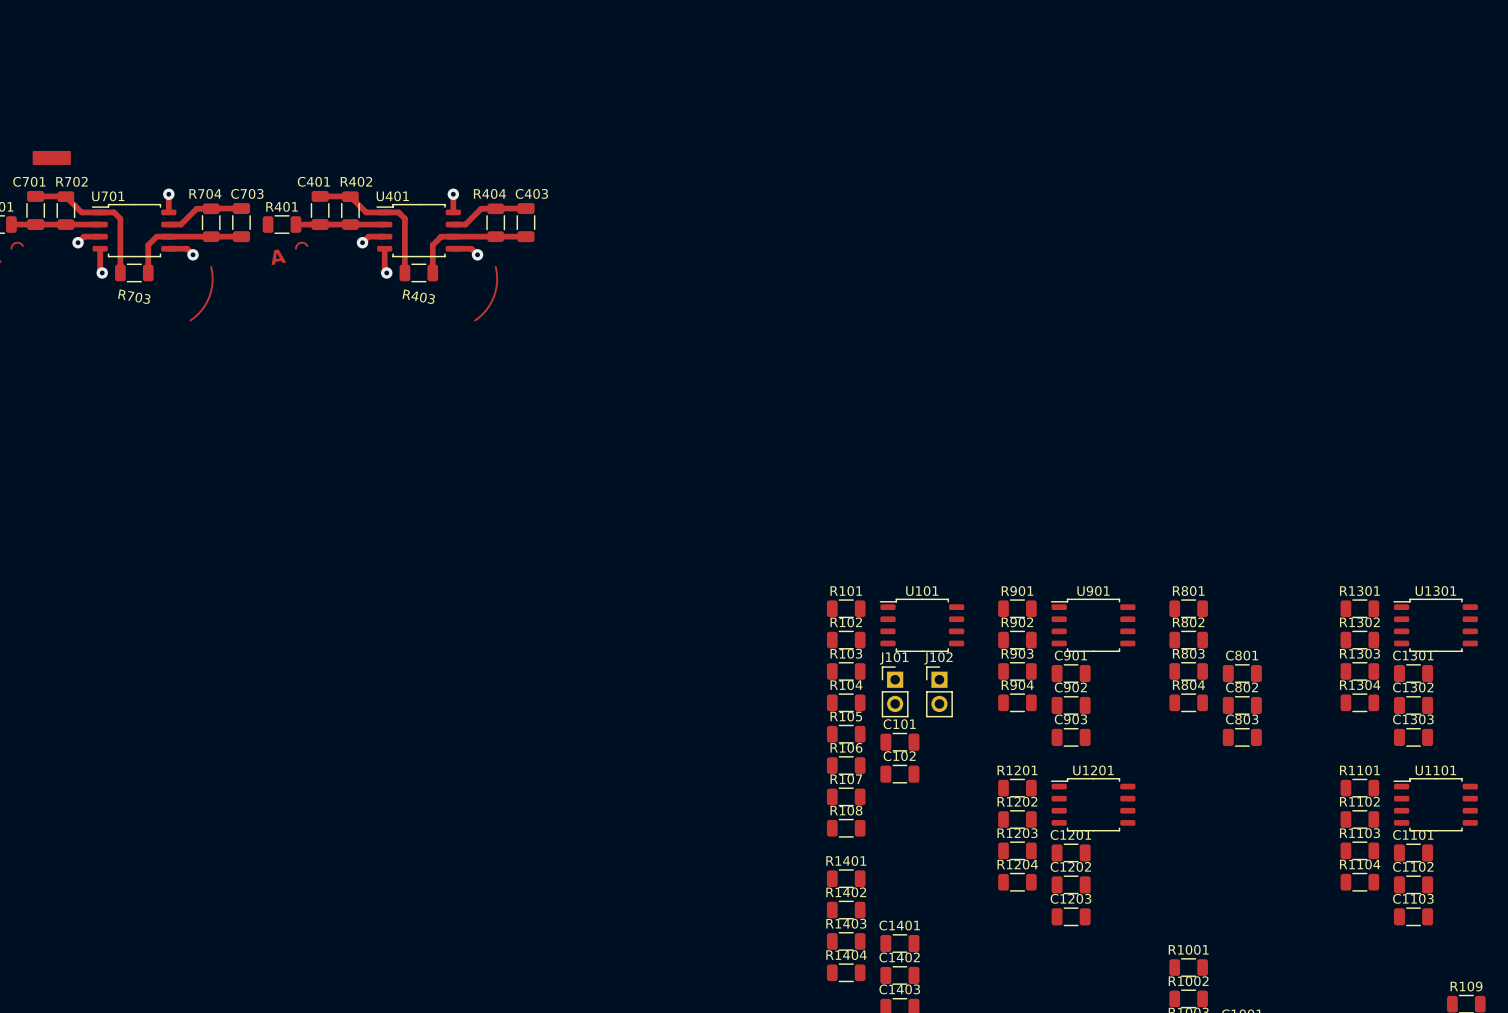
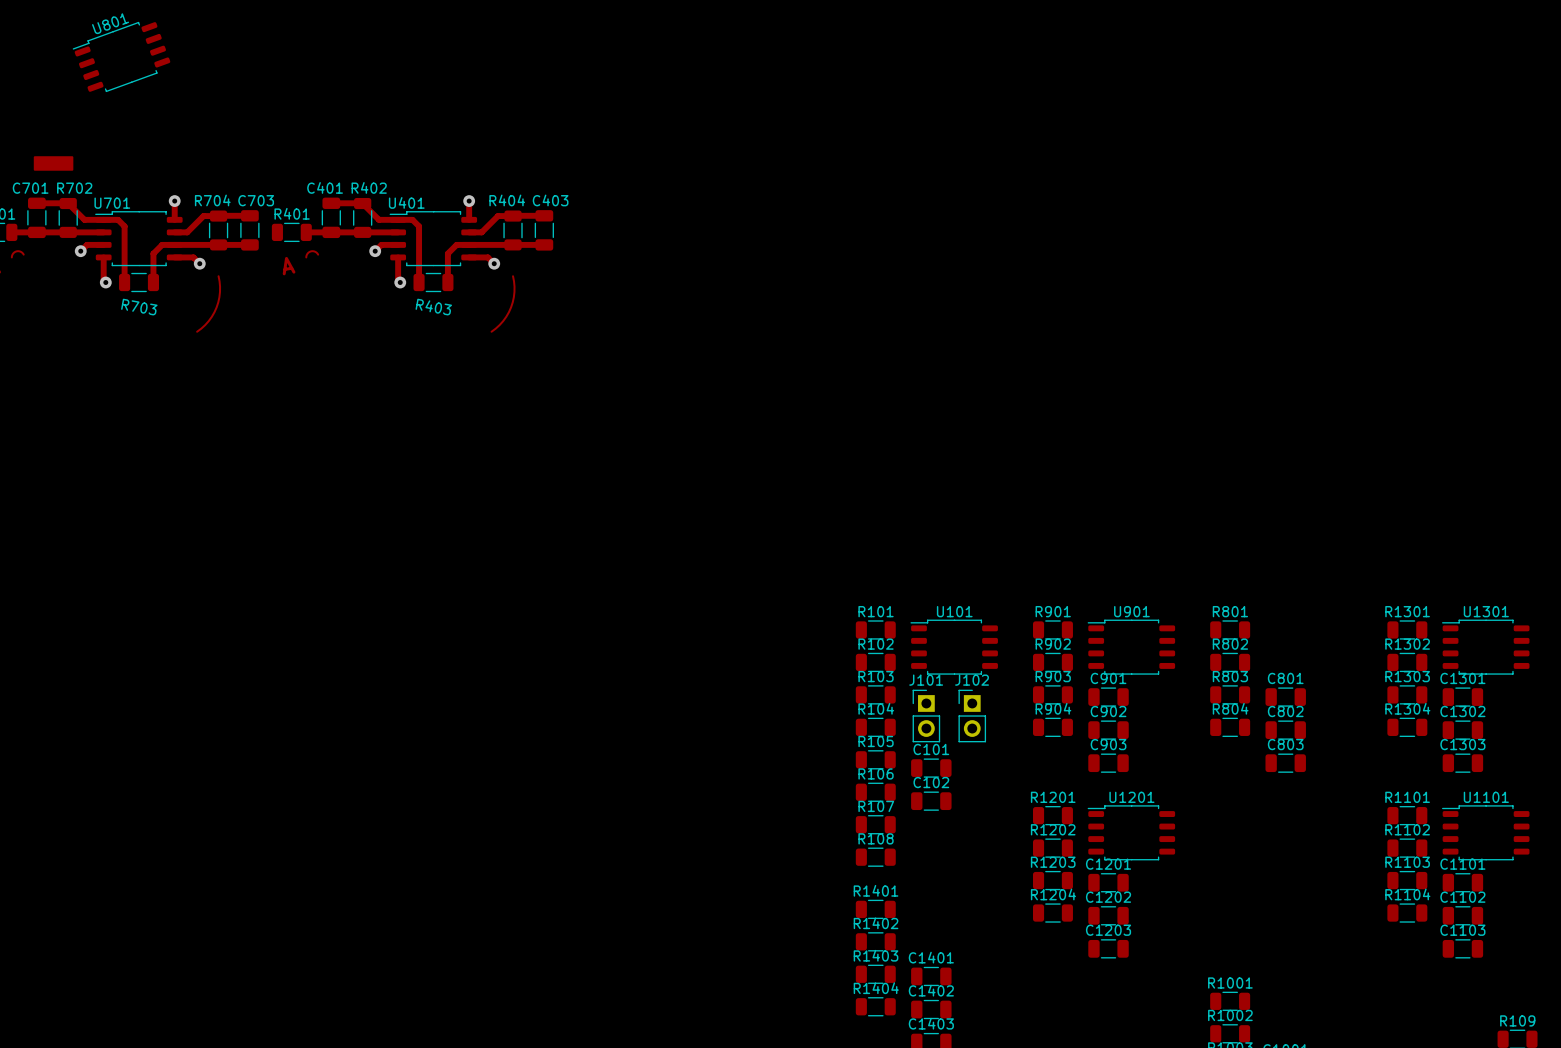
U801: none -> (121, 56)

